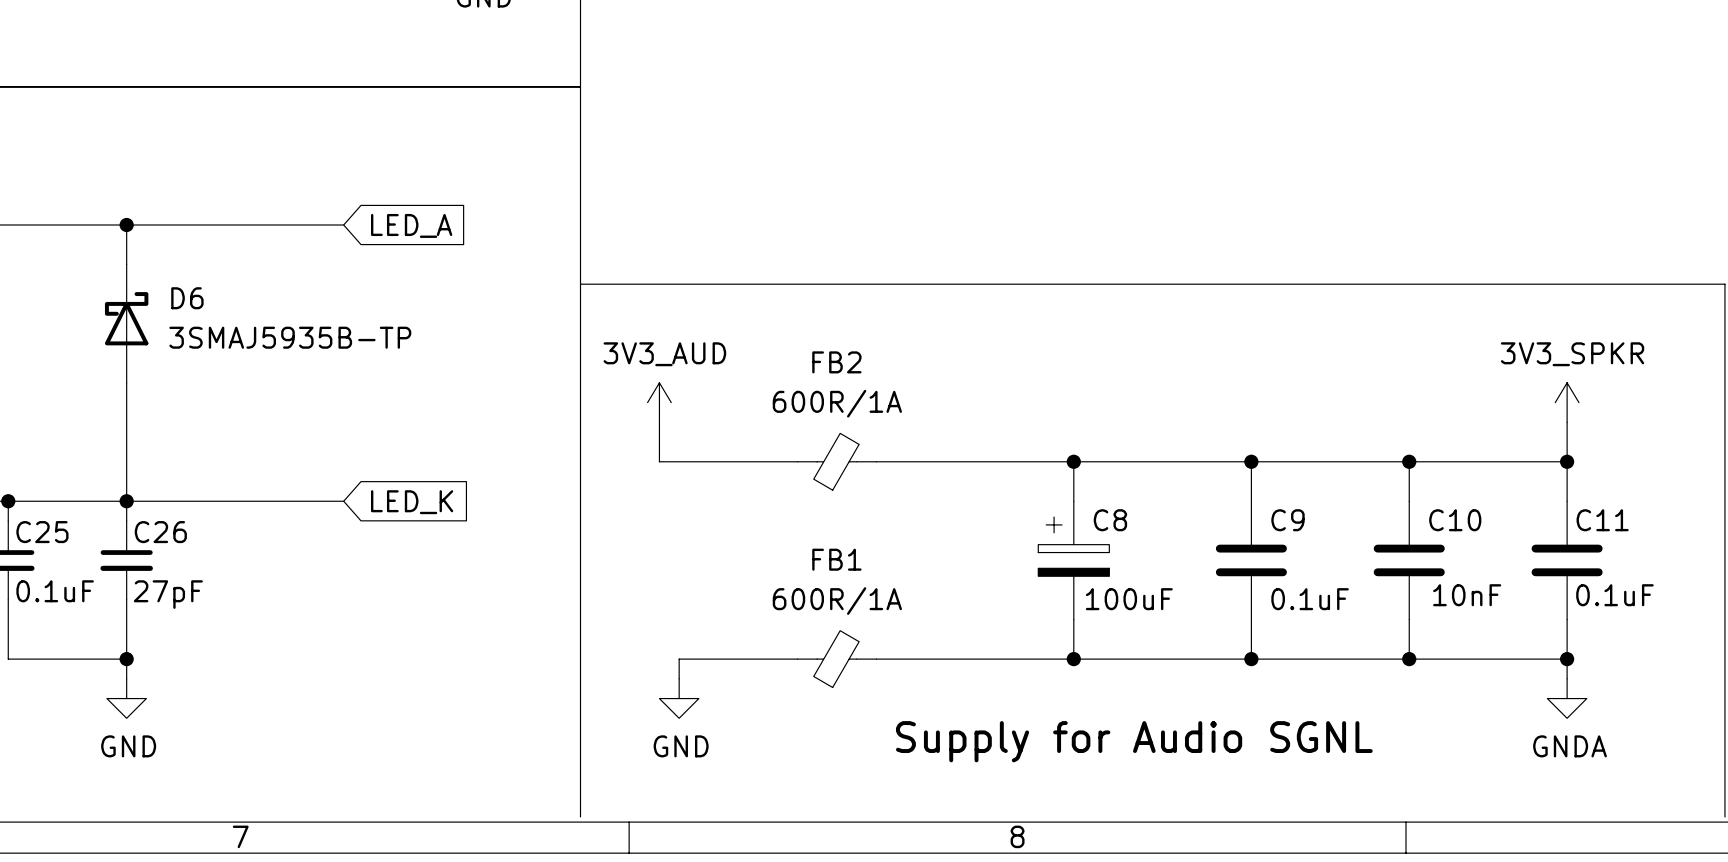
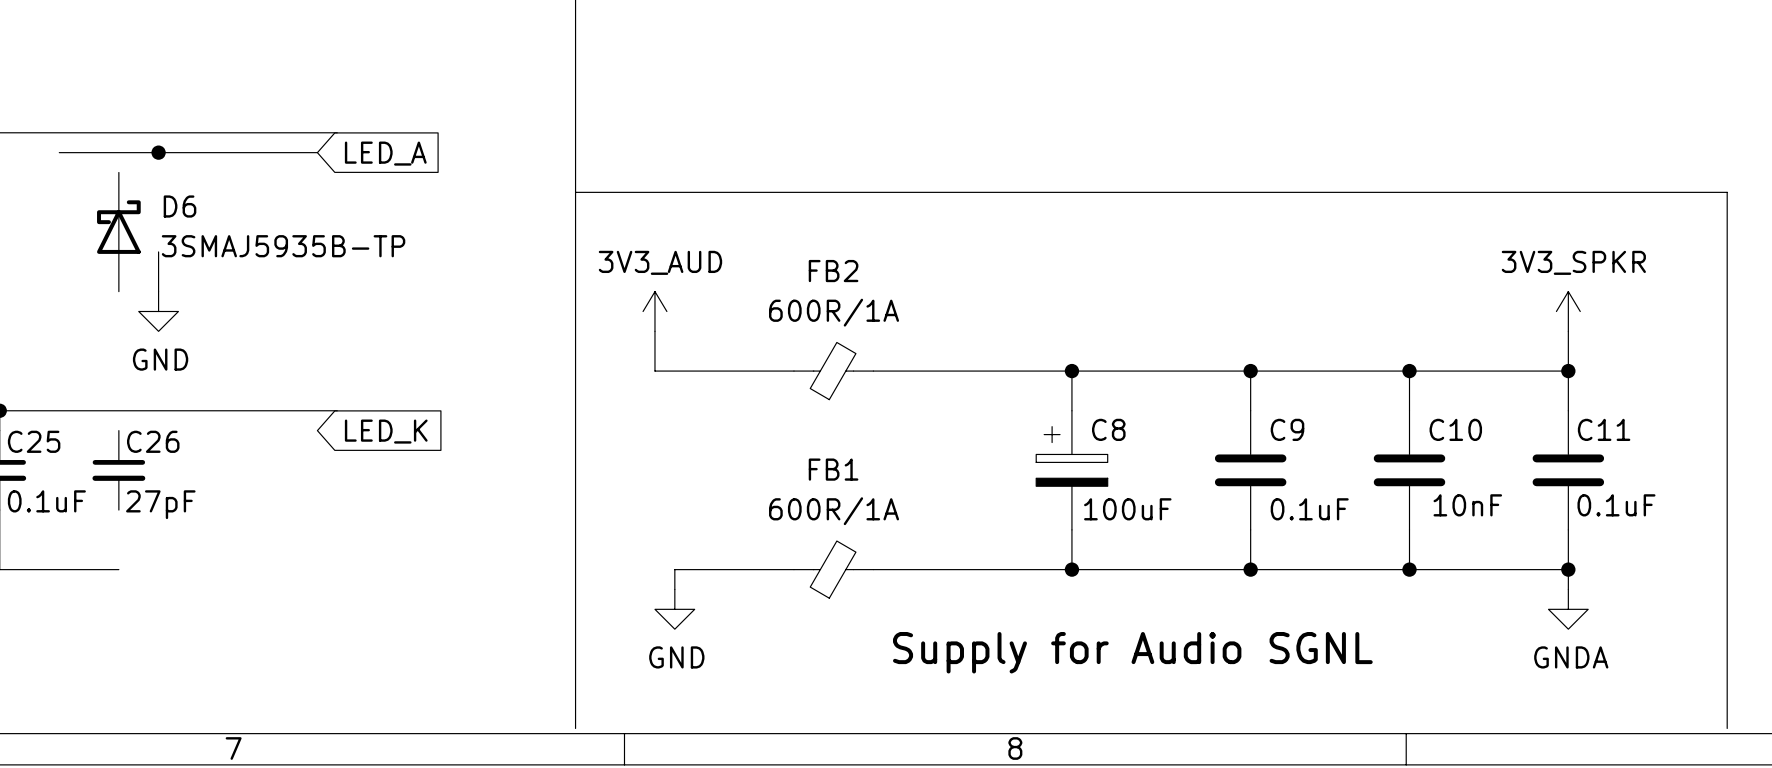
wire: (126, 224) (126, 264) -> (158, 251) (158, 291)
junction position: (126, 224) -> (158, 152)
global label position: LED_A (411, 225) -> LED_A (385, 153)
wire: none -> (59, 152) (317, 152)
wire: (126, 382) (126, 520) -> none
power symbol: none -> GND (158, 311)
junction: (126, 501) -> none
global label position: LED_K (412, 502) -> LED_K (386, 431)
wire: (126, 599) (126, 678) -> none
junction: (126, 659) -> none
power symbol: GND (126, 698) -> none

